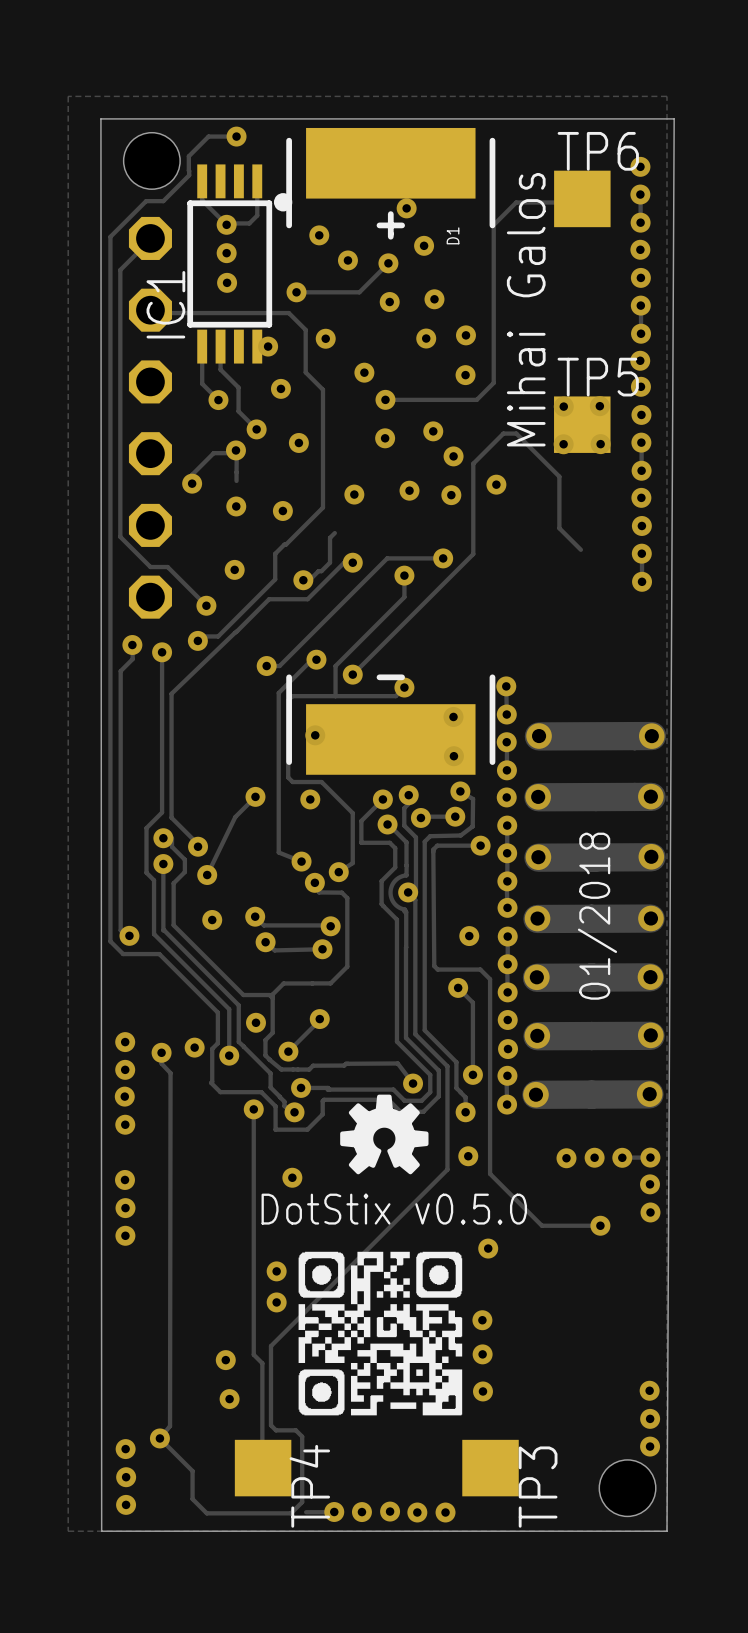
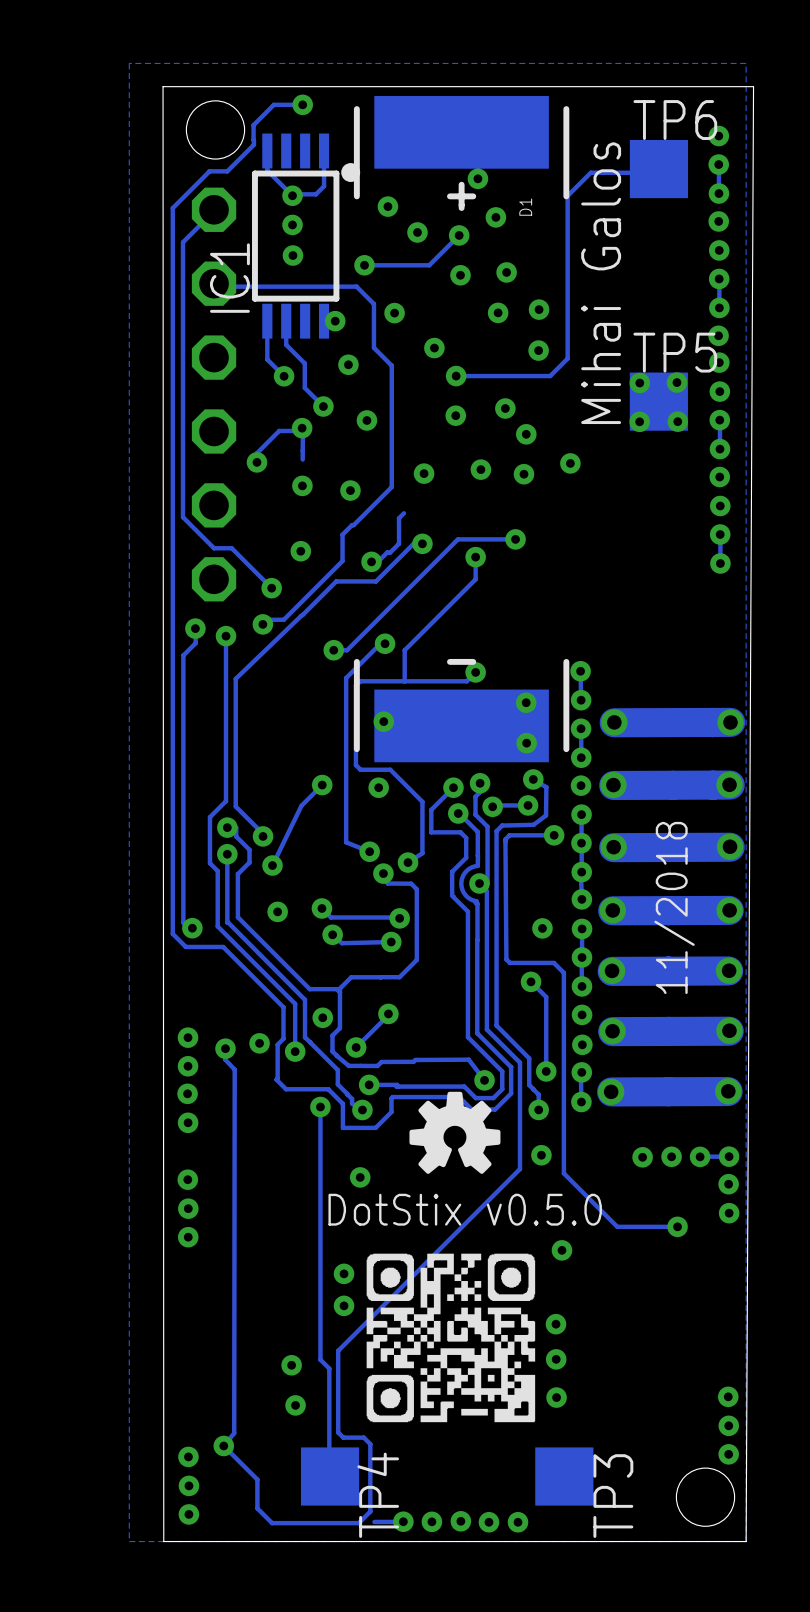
track: (580, 549) (559, 528) (559, 476) (516, 433) (503, 433) (473, 463) (473, 554) (352, 674) -> none
via: (352, 674) -> none
text: 01/2018 (597, 916) -> 11/2018 (674, 907)

